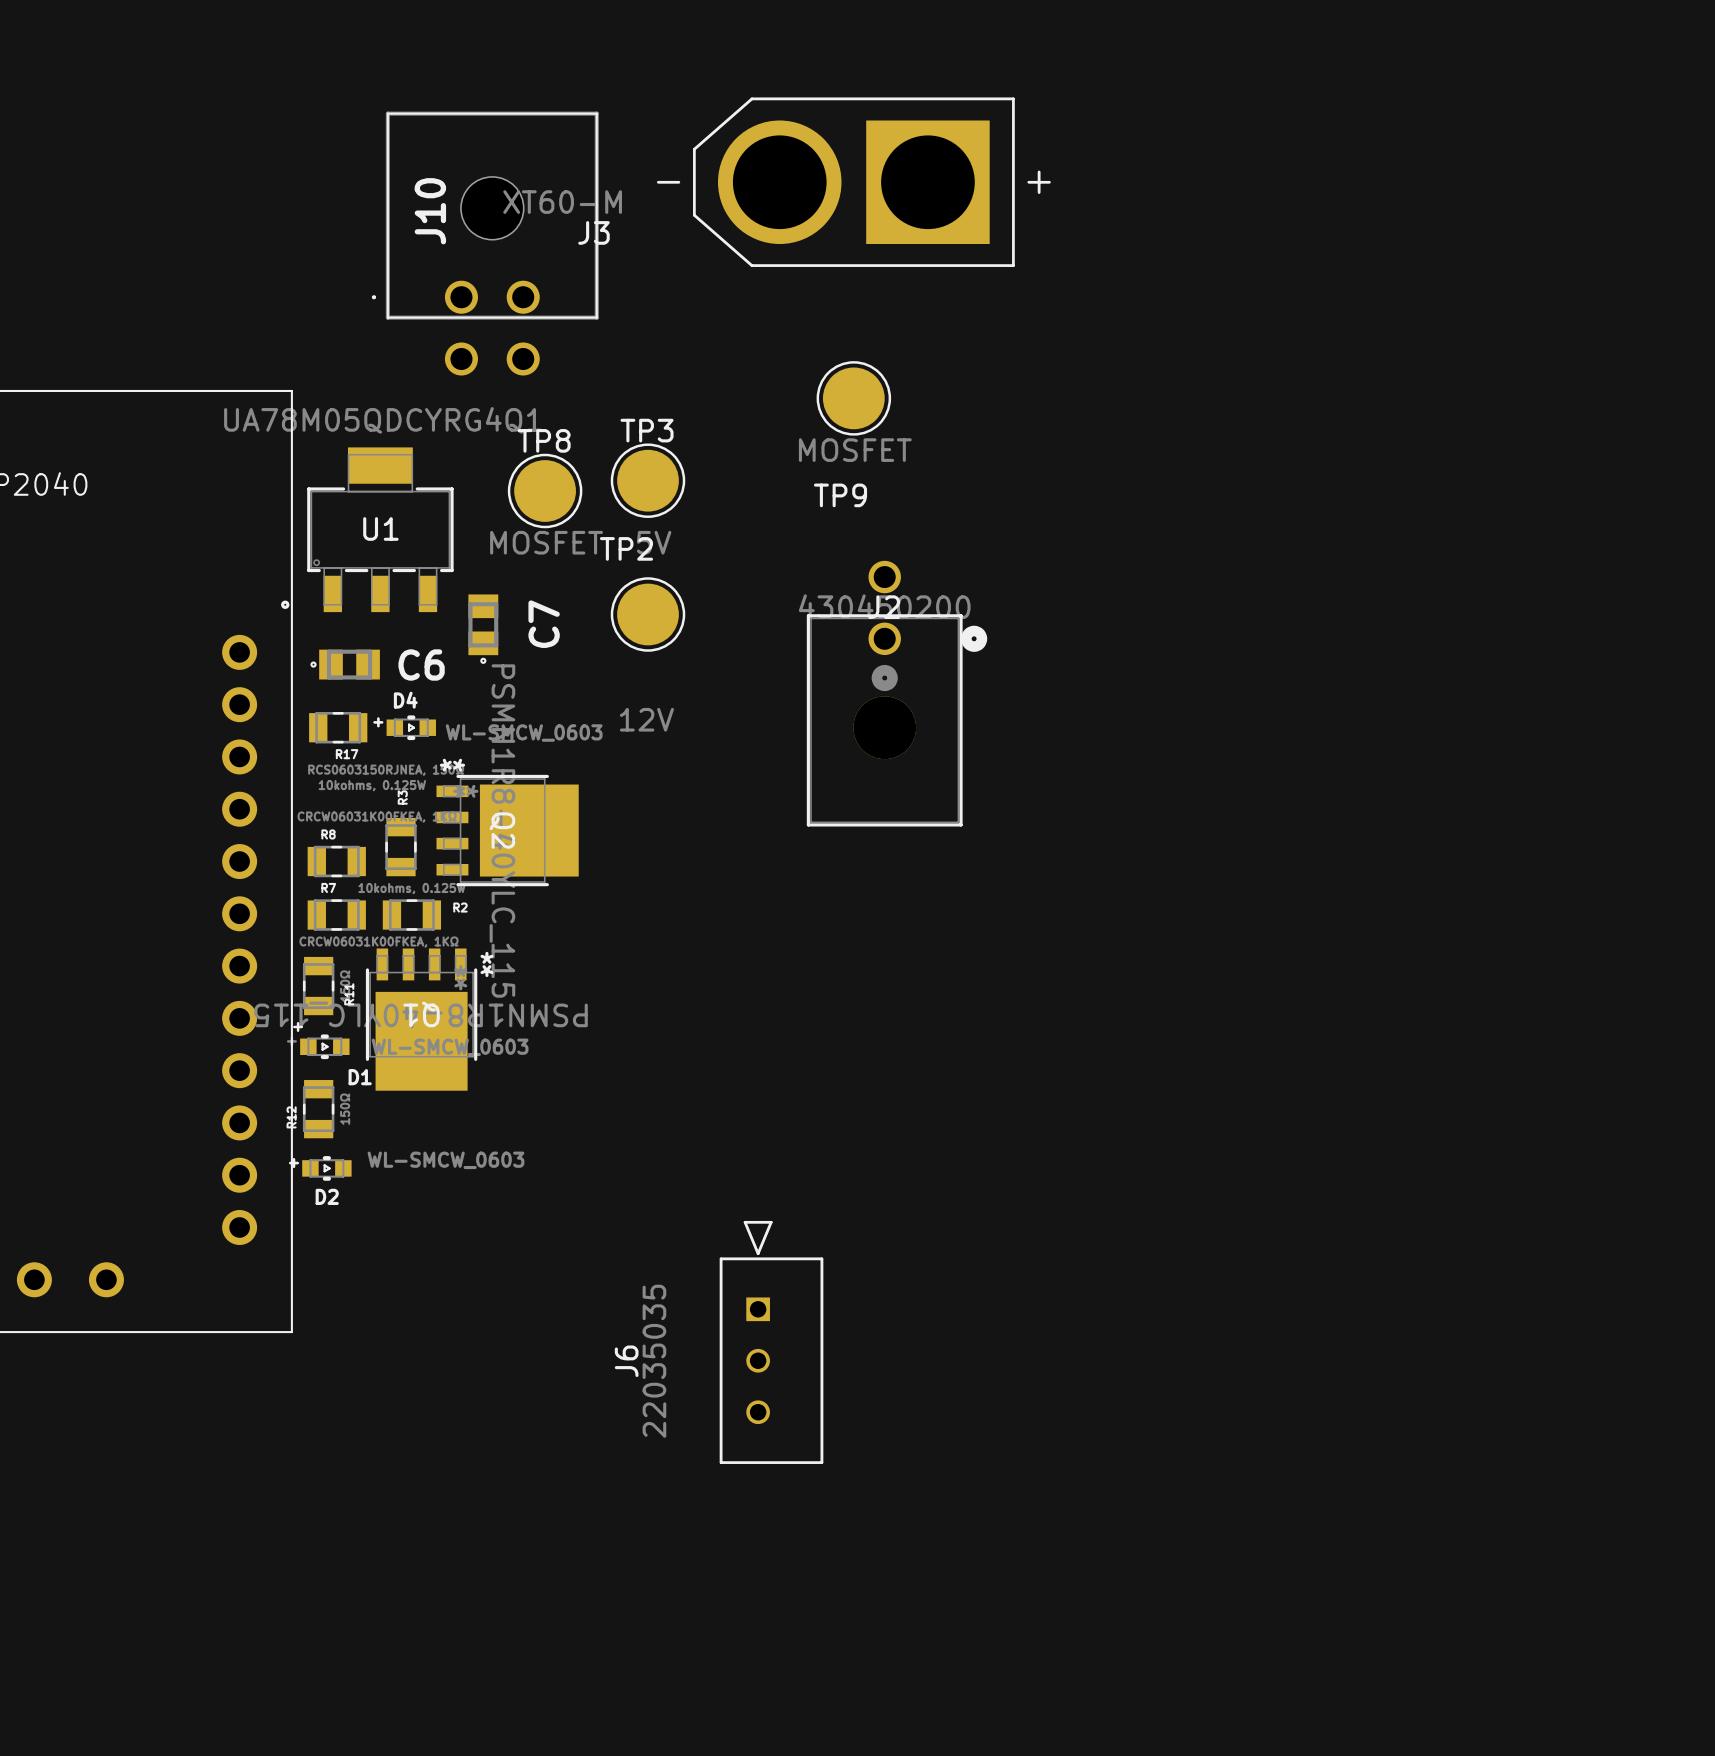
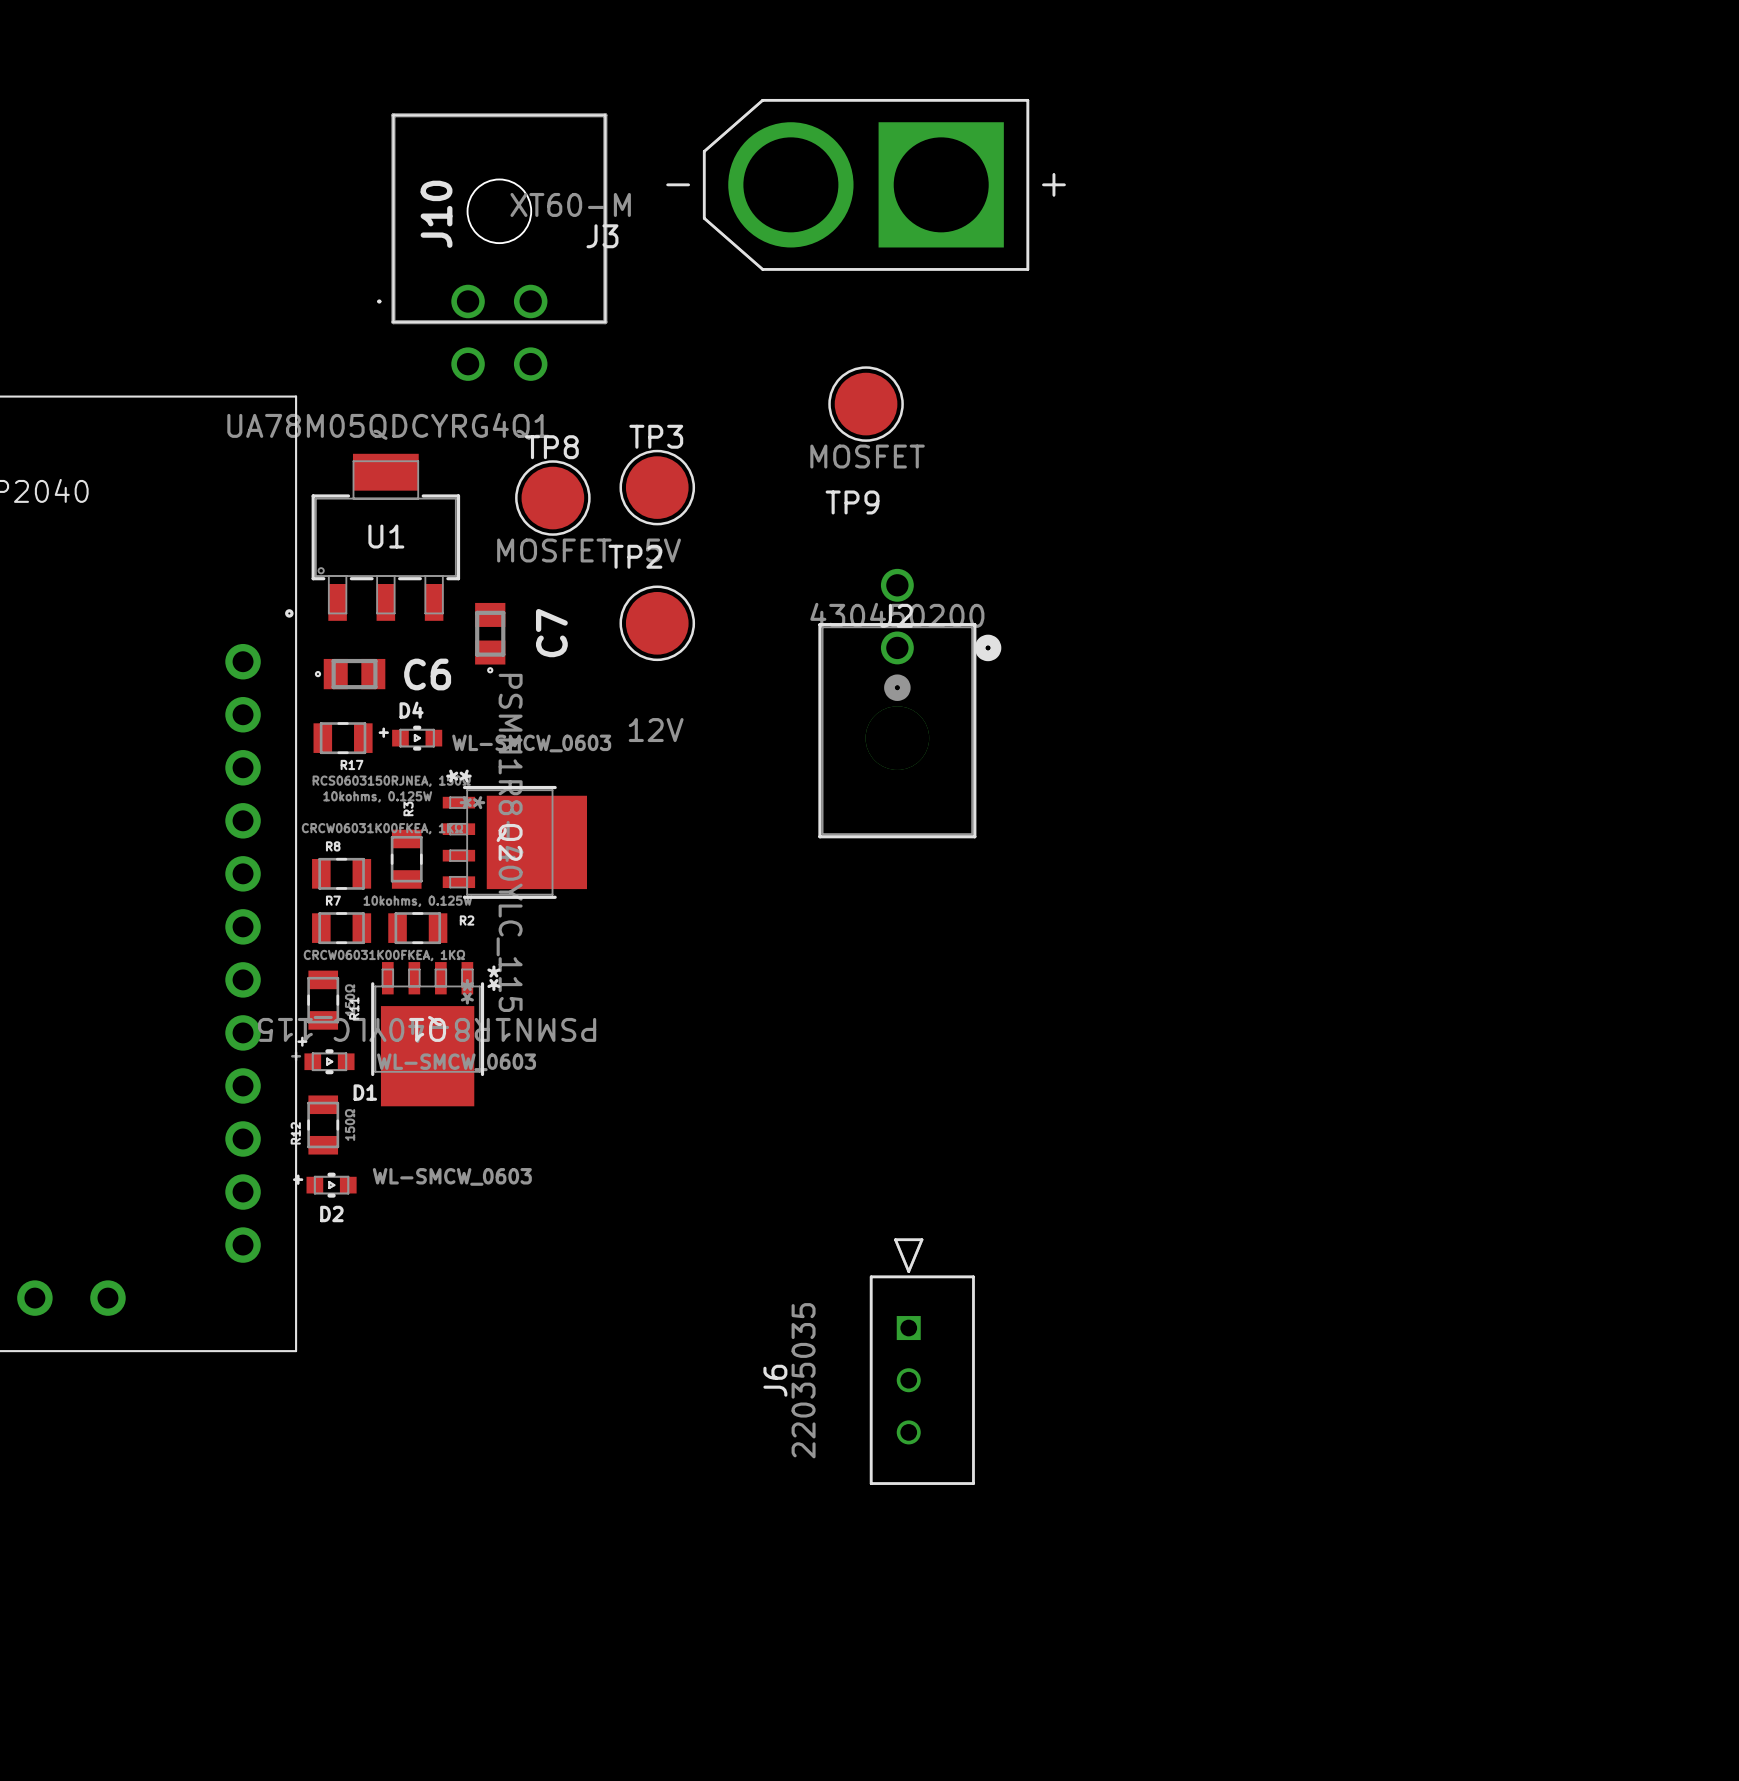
J6 position: (771, 1342) -> (922, 1361)

